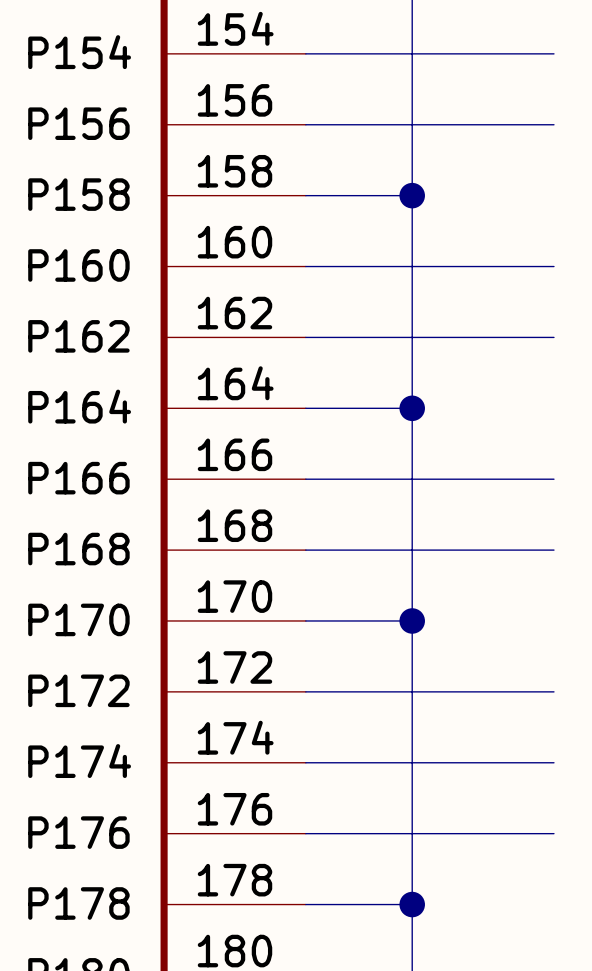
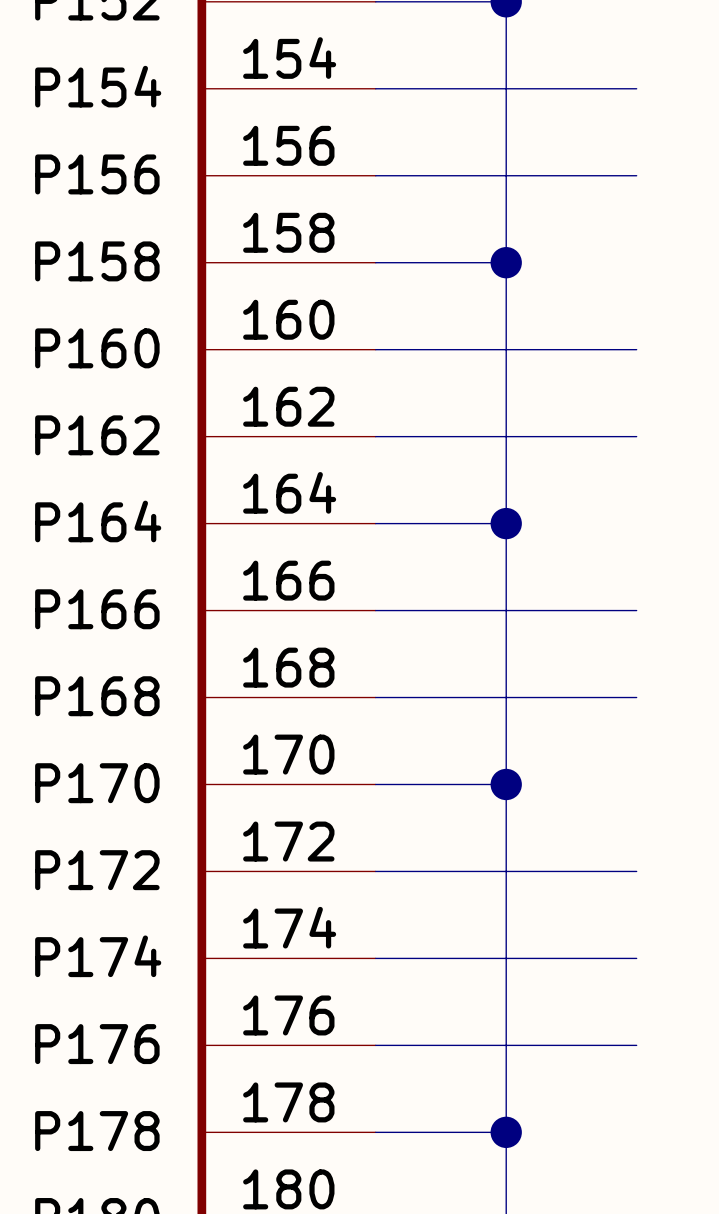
wire: (518, 53) (553, 53) -> none
wire: (518, 124) (553, 124) -> none
wire: (518, 266) (553, 266) -> none
wire: (518, 337) (553, 337) -> none
wire: (518, 479) (553, 479) -> none
wire: (518, 550) (553, 550) -> none
wire: (518, 691) (553, 691) -> none
wire: (518, 762) (553, 762) -> none
wire: (518, 833) (553, 833) -> none

